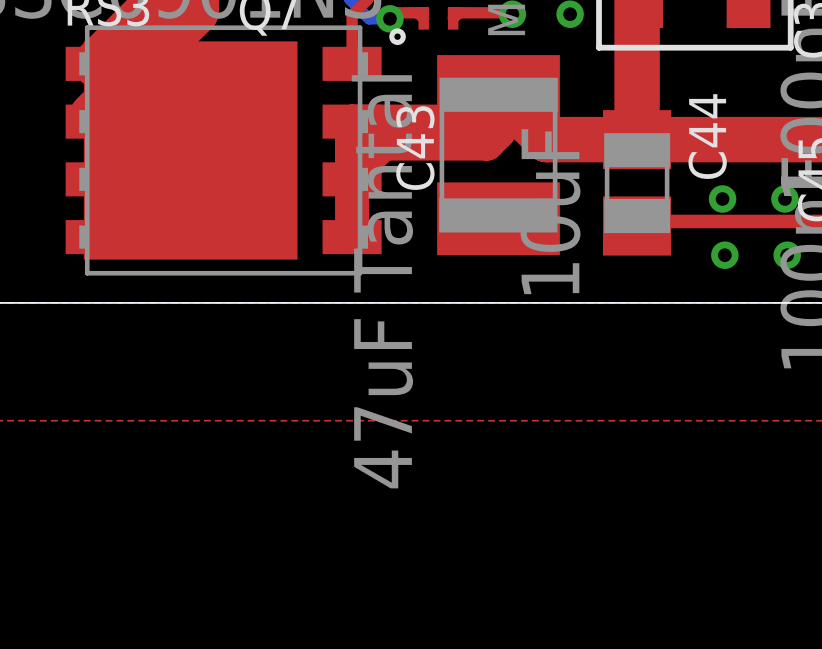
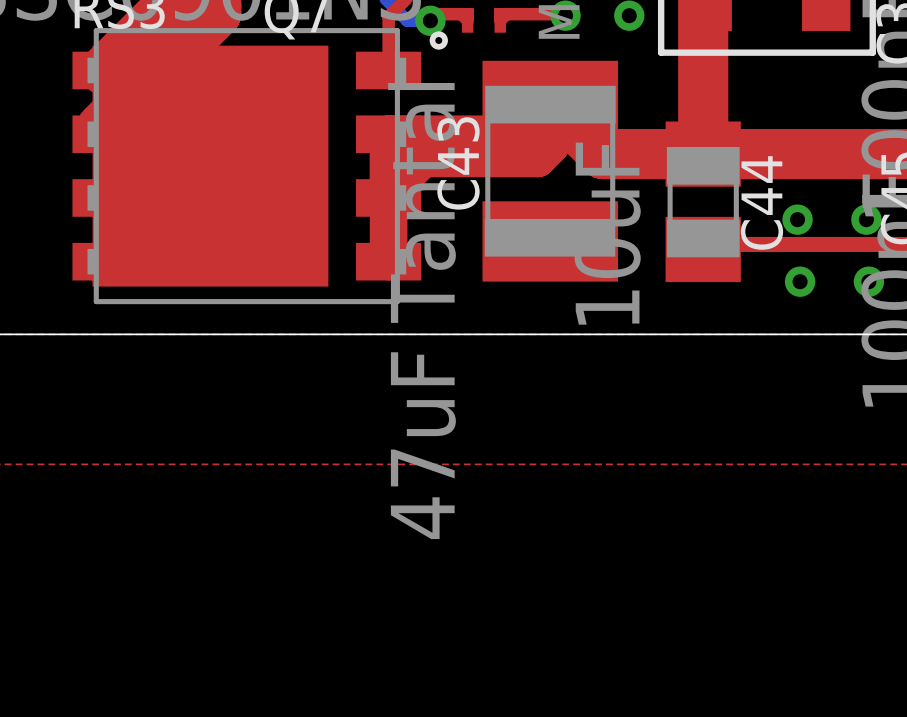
C44 name position: C44 (707, 136) -> C44 (761, 202)

